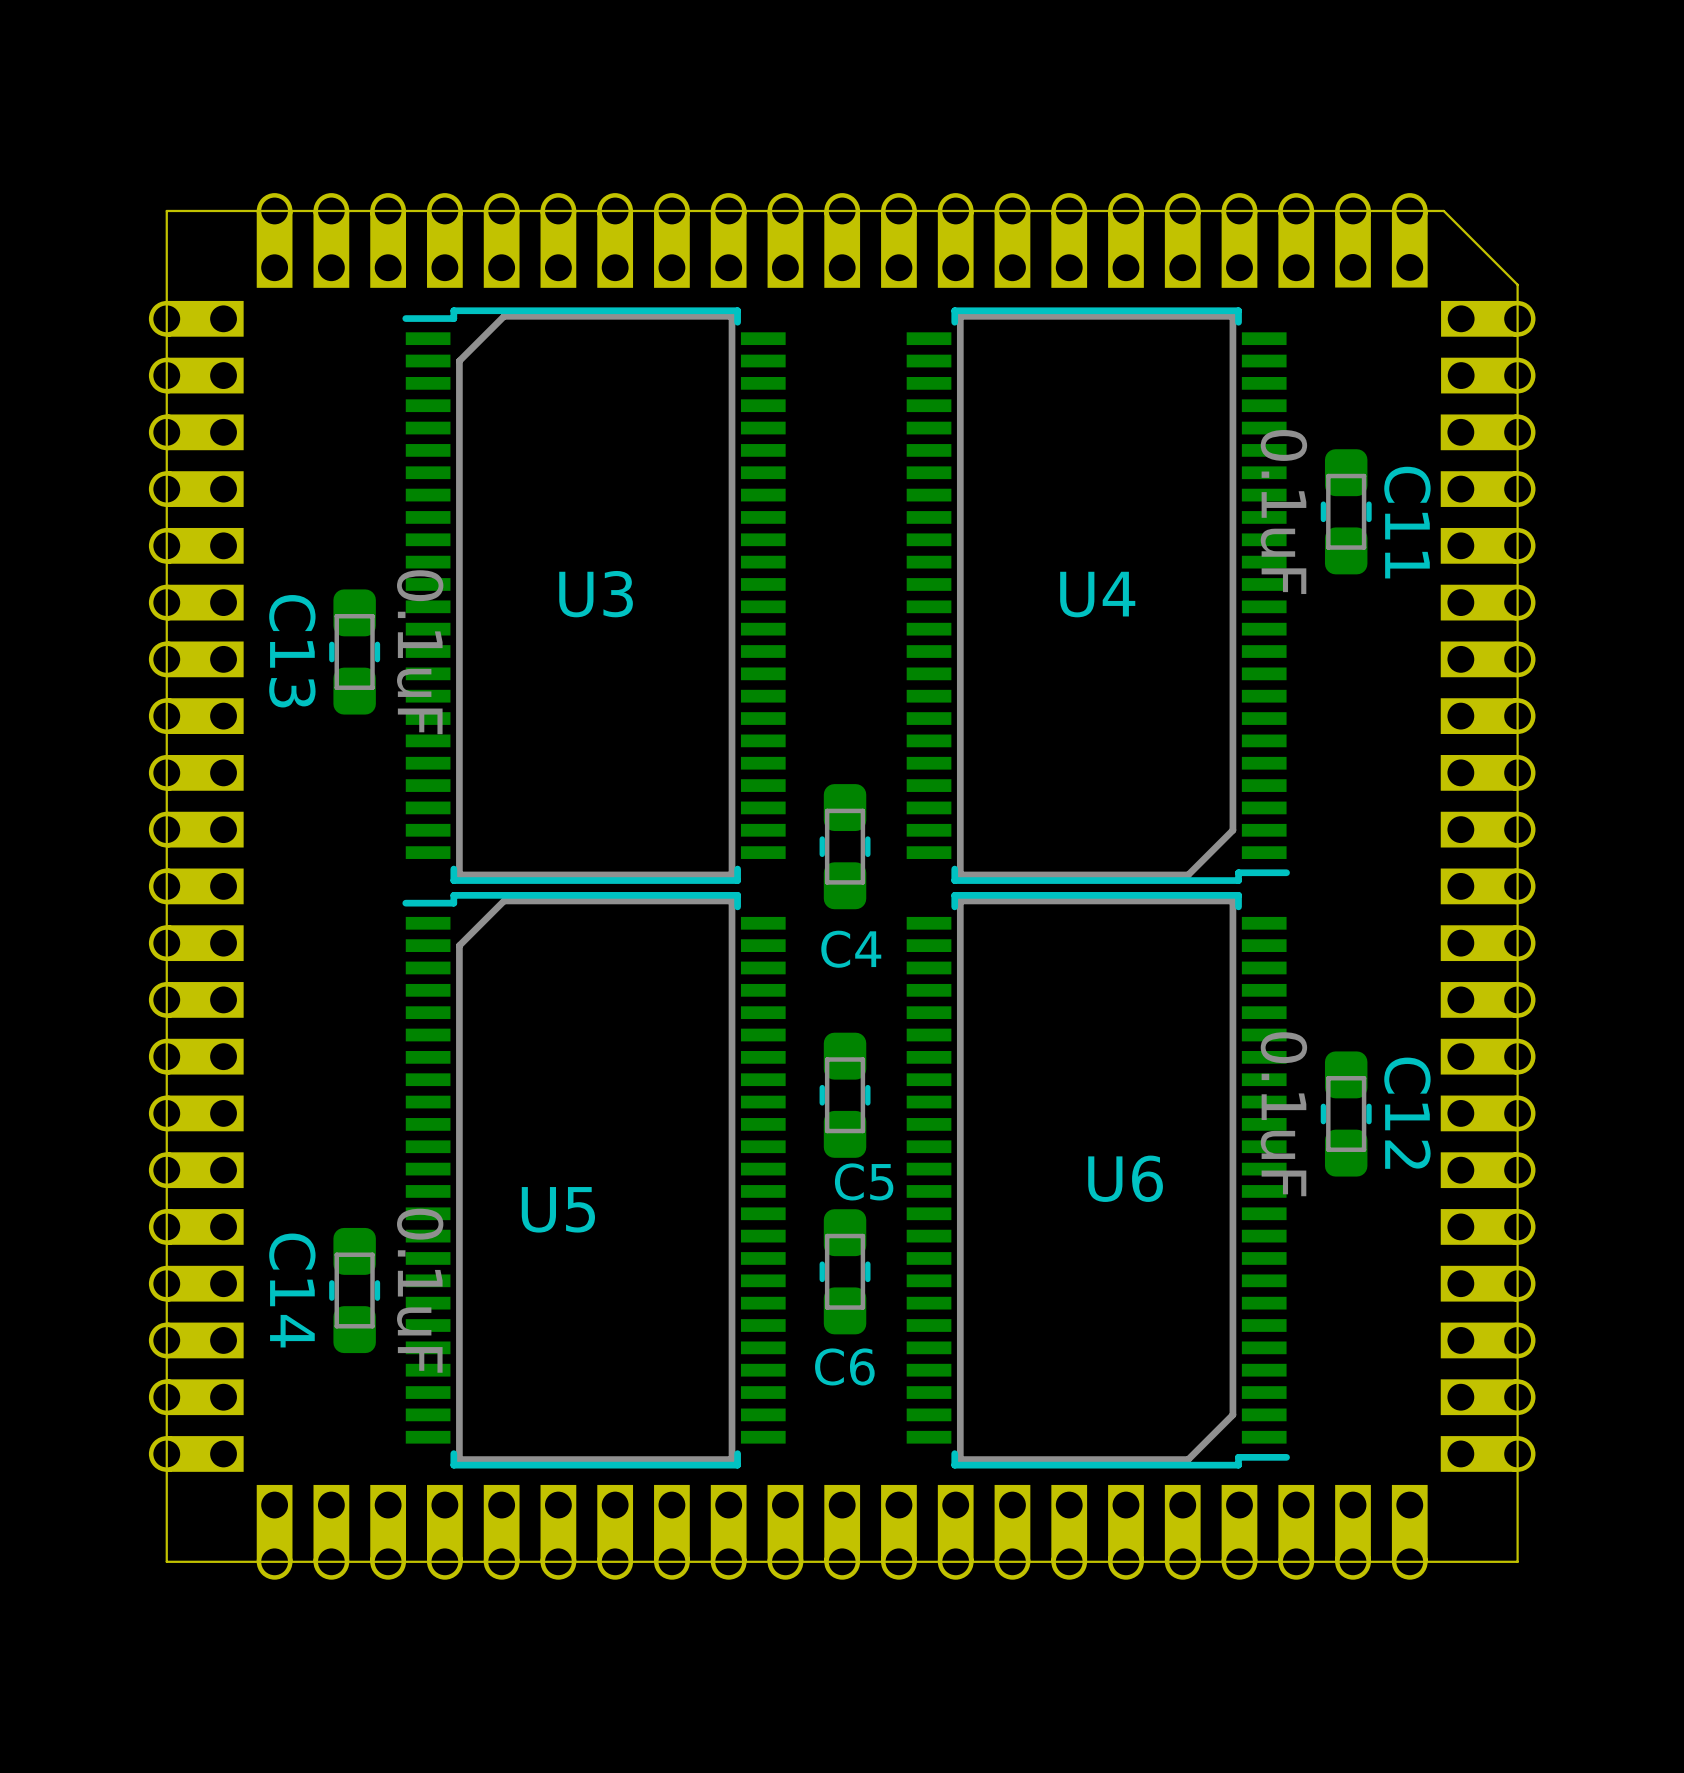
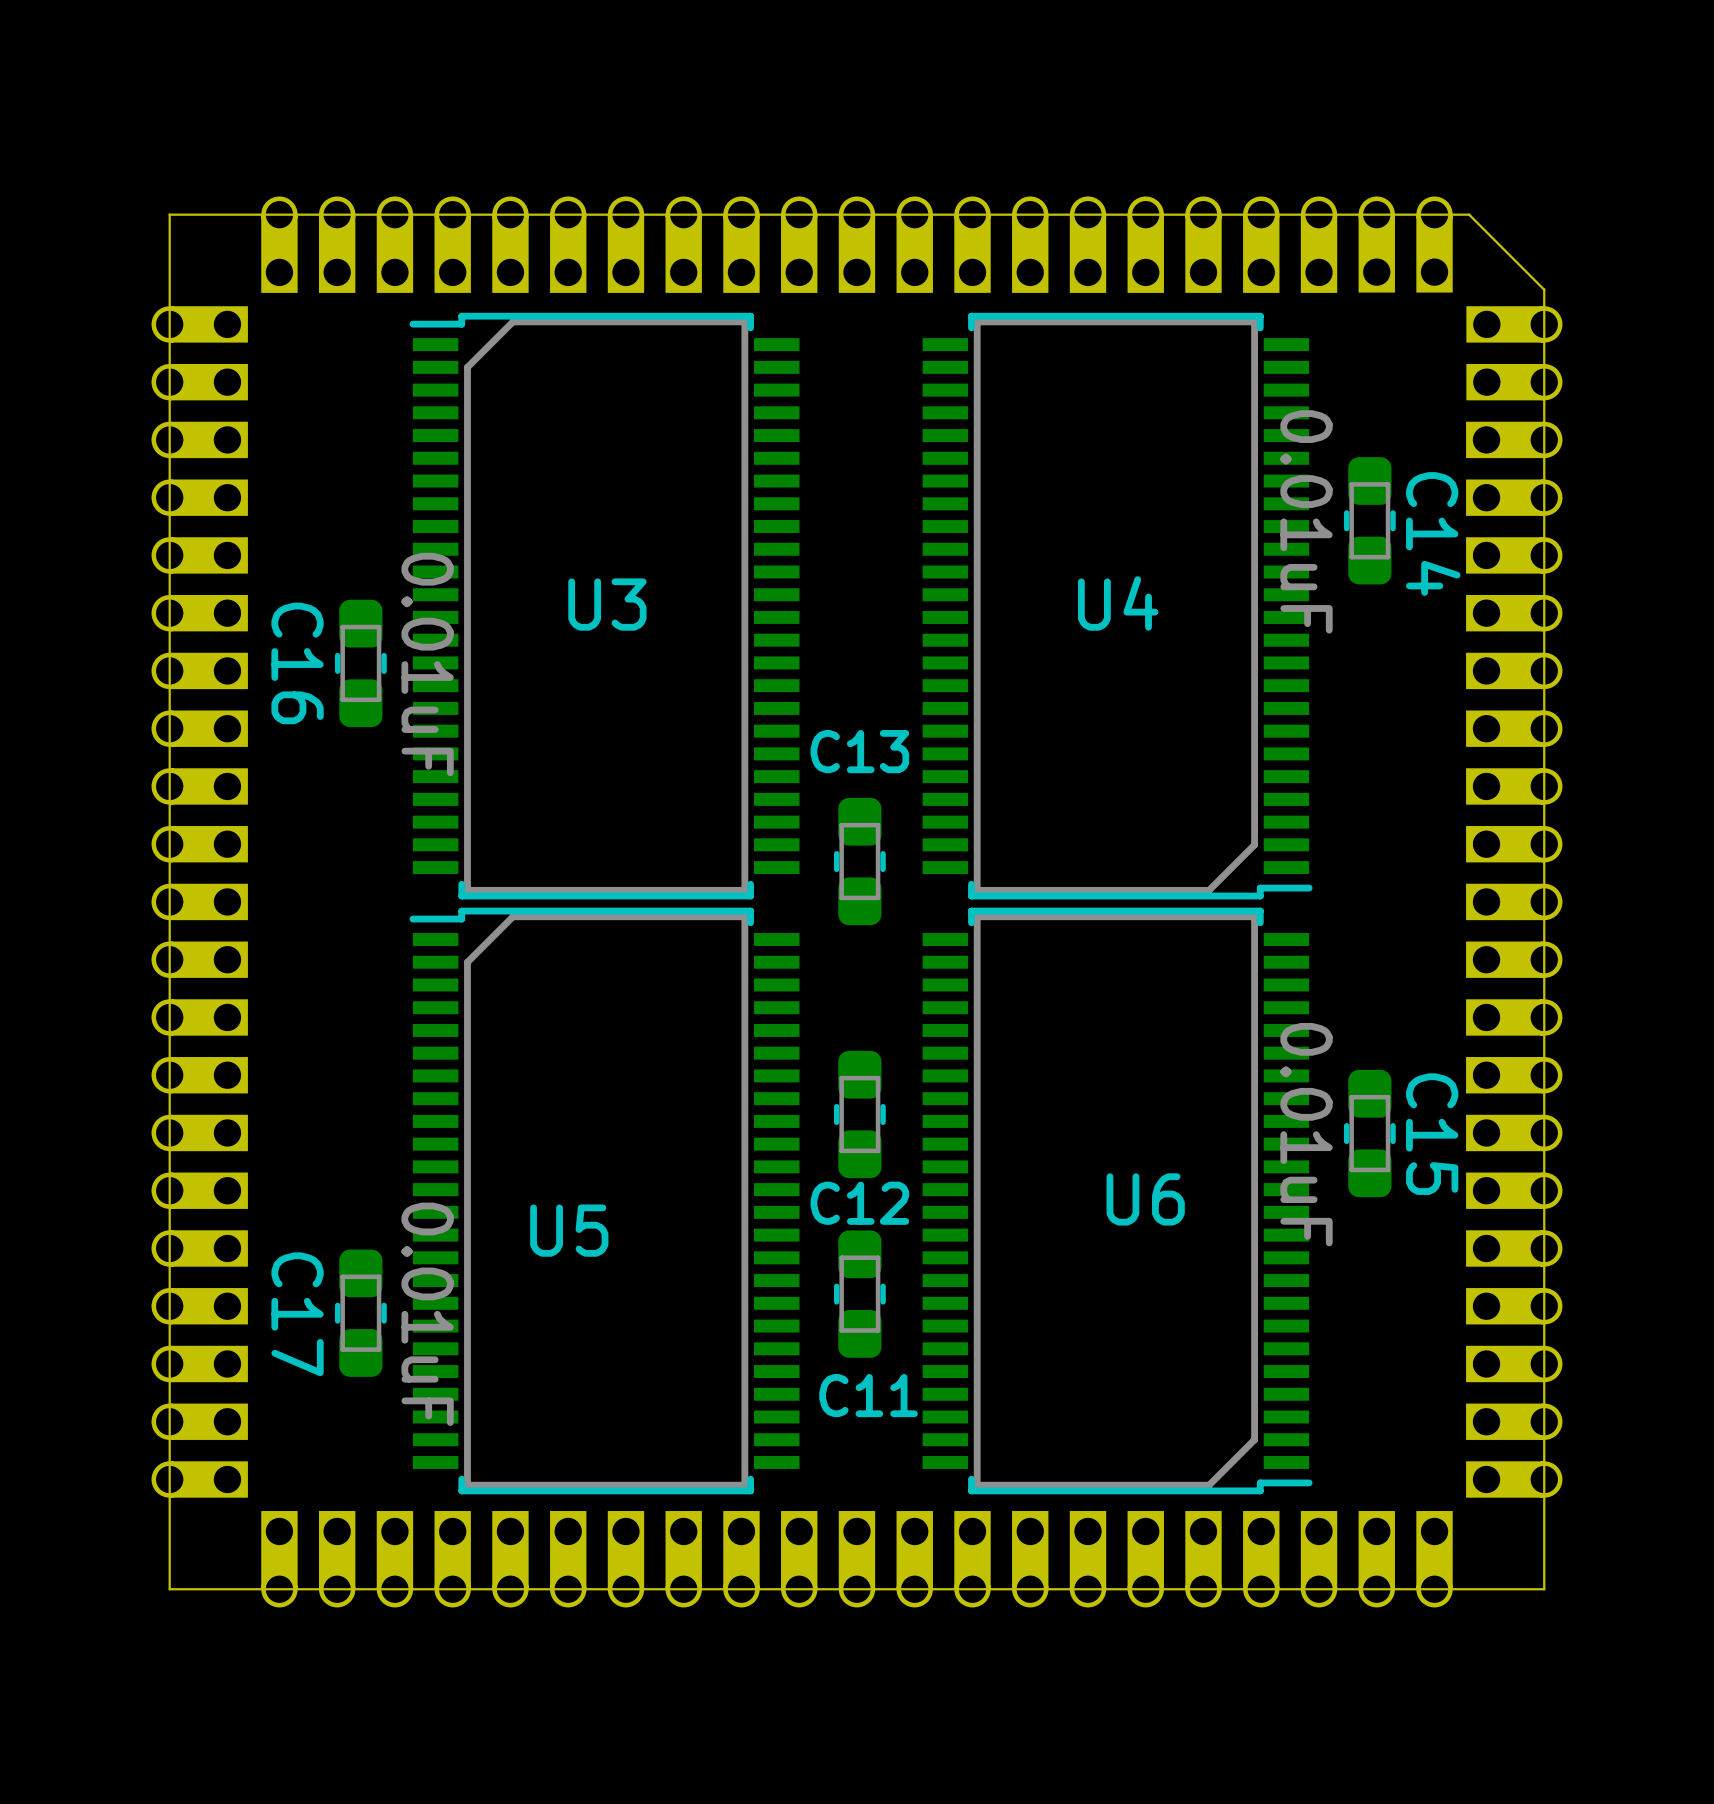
C11 value: 0.1uF (1283, 512) -> 0.01uF (1306, 521)
C11 name: C11 (1407, 522) -> C14 (1433, 533)
C13 name: C13 (292, 651) -> C16 (297, 663)
C13 value: 0.1uF (420, 652) -> 0.01uF (427, 664)
C4 name: C4 (851, 949) -> C13 (859, 751)
C12 name: C12 (1407, 1113) -> C15 (1432, 1134)
C12 value: 0.1uF (1283, 1114) -> 0.01uF (1306, 1134)
C5 name: C5 (864, 1181) -> C12 (859, 1203)
C14 name: C14 (292, 1290) -> C17 (297, 1314)
C14 value: 0.1uF (420, 1290) -> 0.01uF (427, 1314)
C6 name: C6 (844, 1366) -> C11 (868, 1395)

